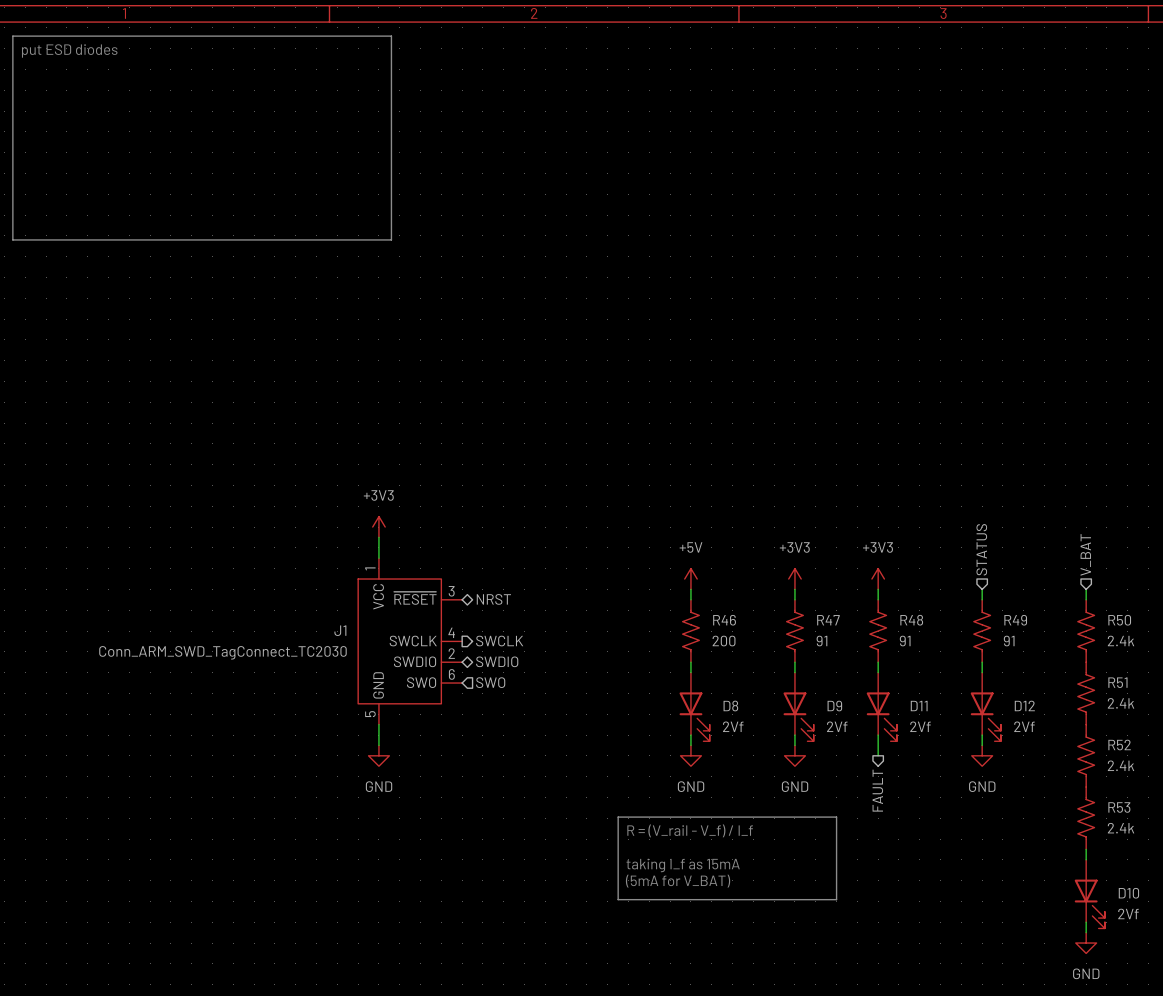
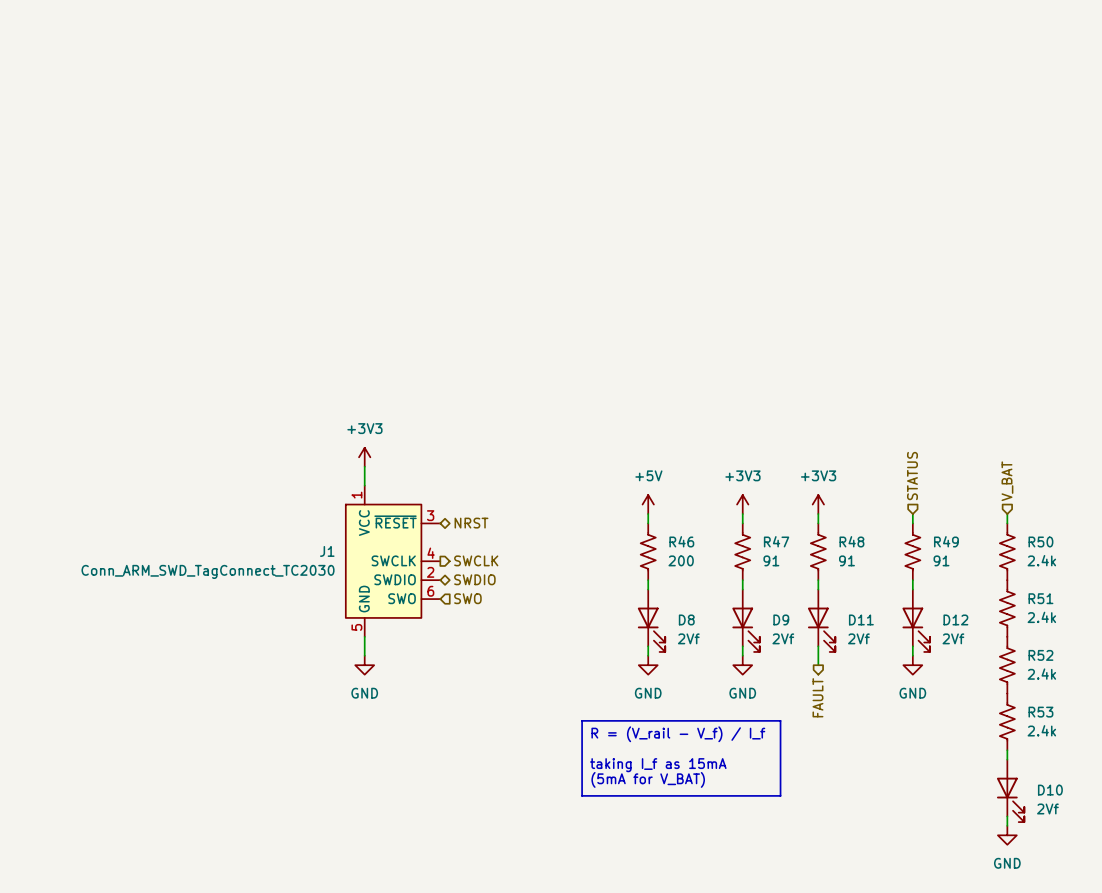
line: (12, 36) (391, 36) (391, 239) (12, 239) (12, 36) -> none
text: put ESD diodes (69, 50) -> none

